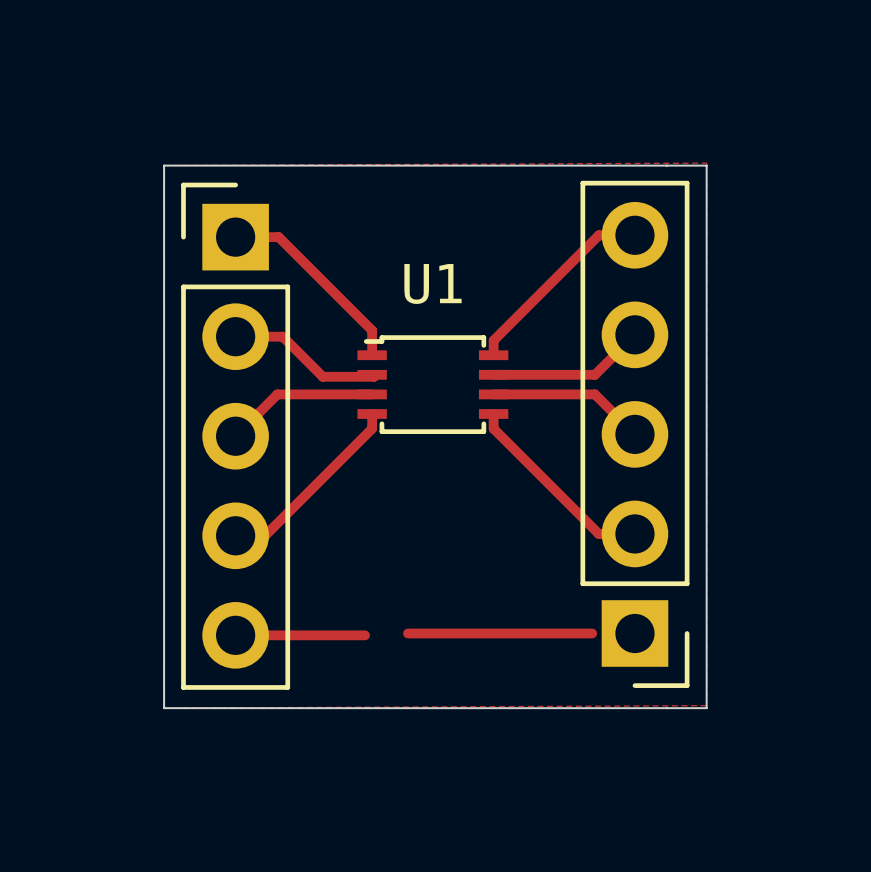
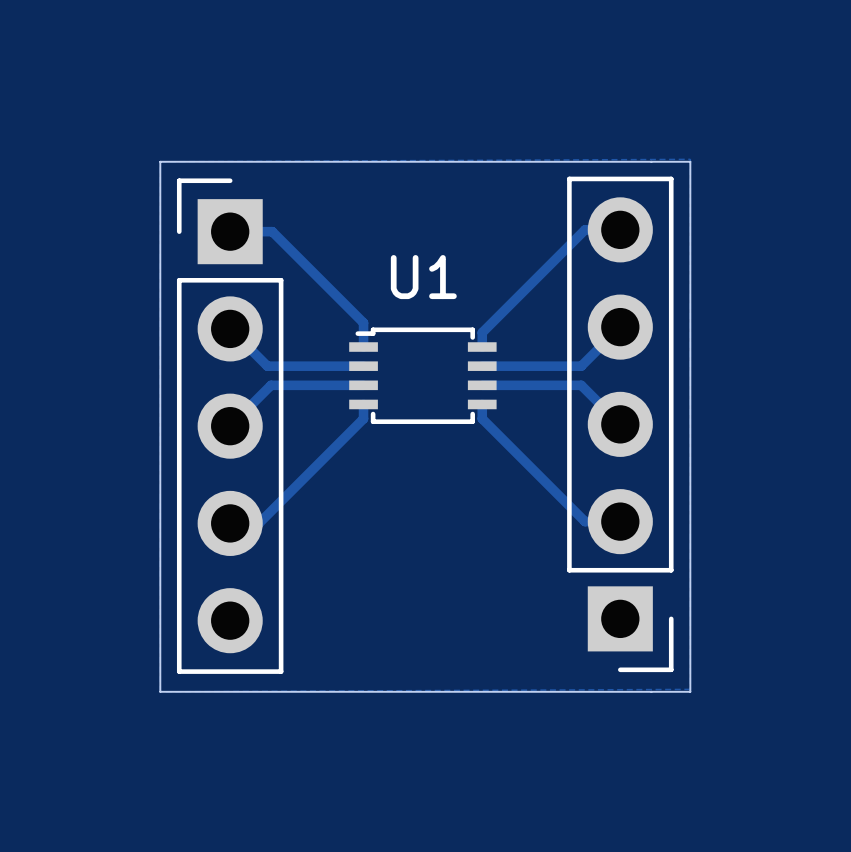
track: (235, 336) (282, 336) (322, 376) (374, 376) (372, 374) -> (230, 328) (267, 366) (363, 366)
track: (407, 633) (592, 633) -> none
track: (235, 635) (365, 635) -> none

